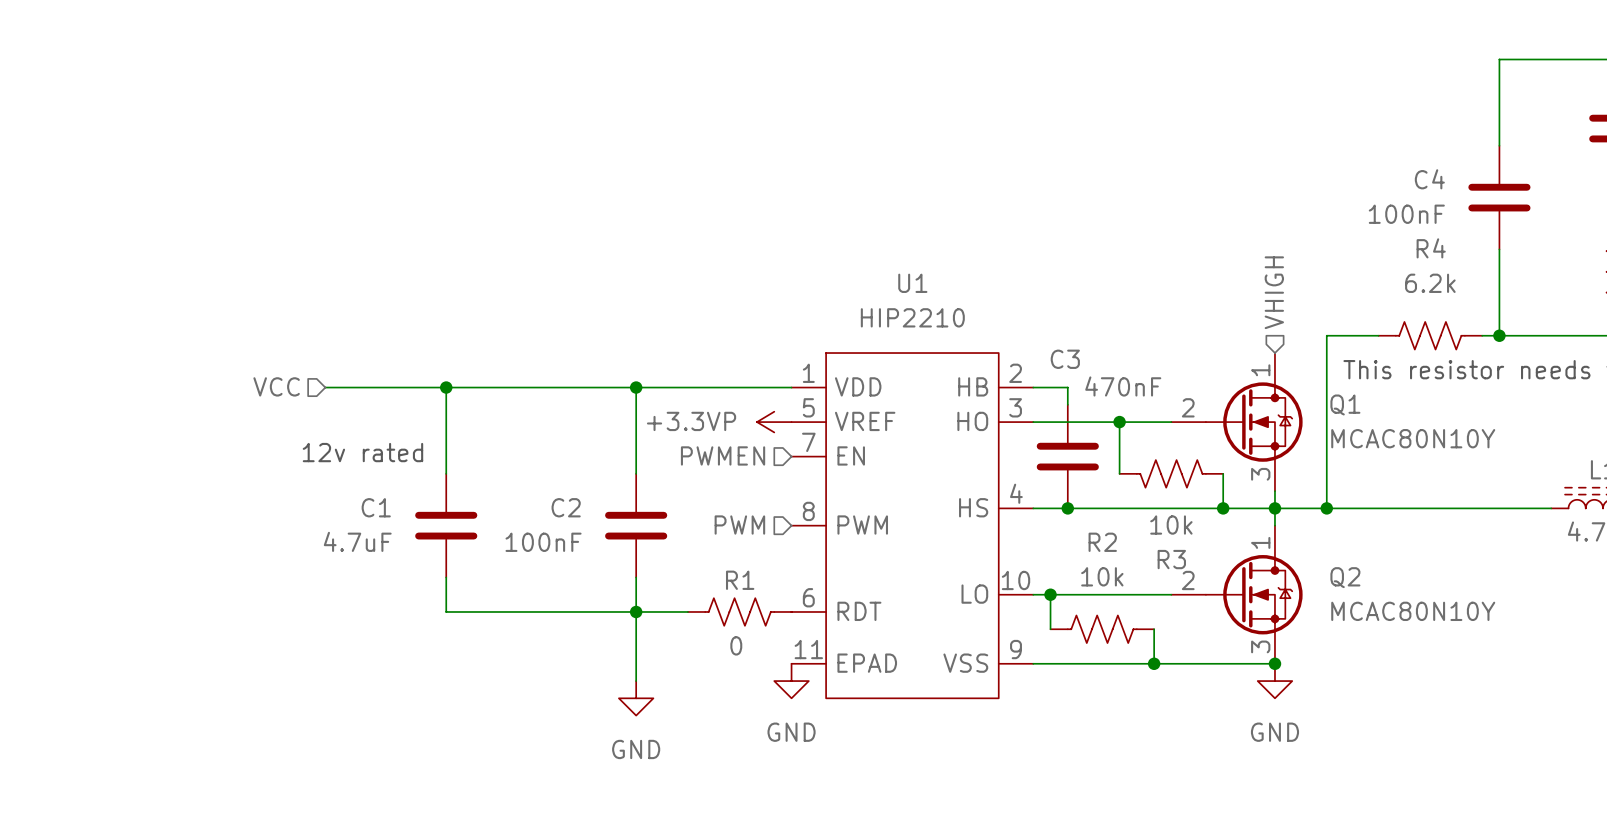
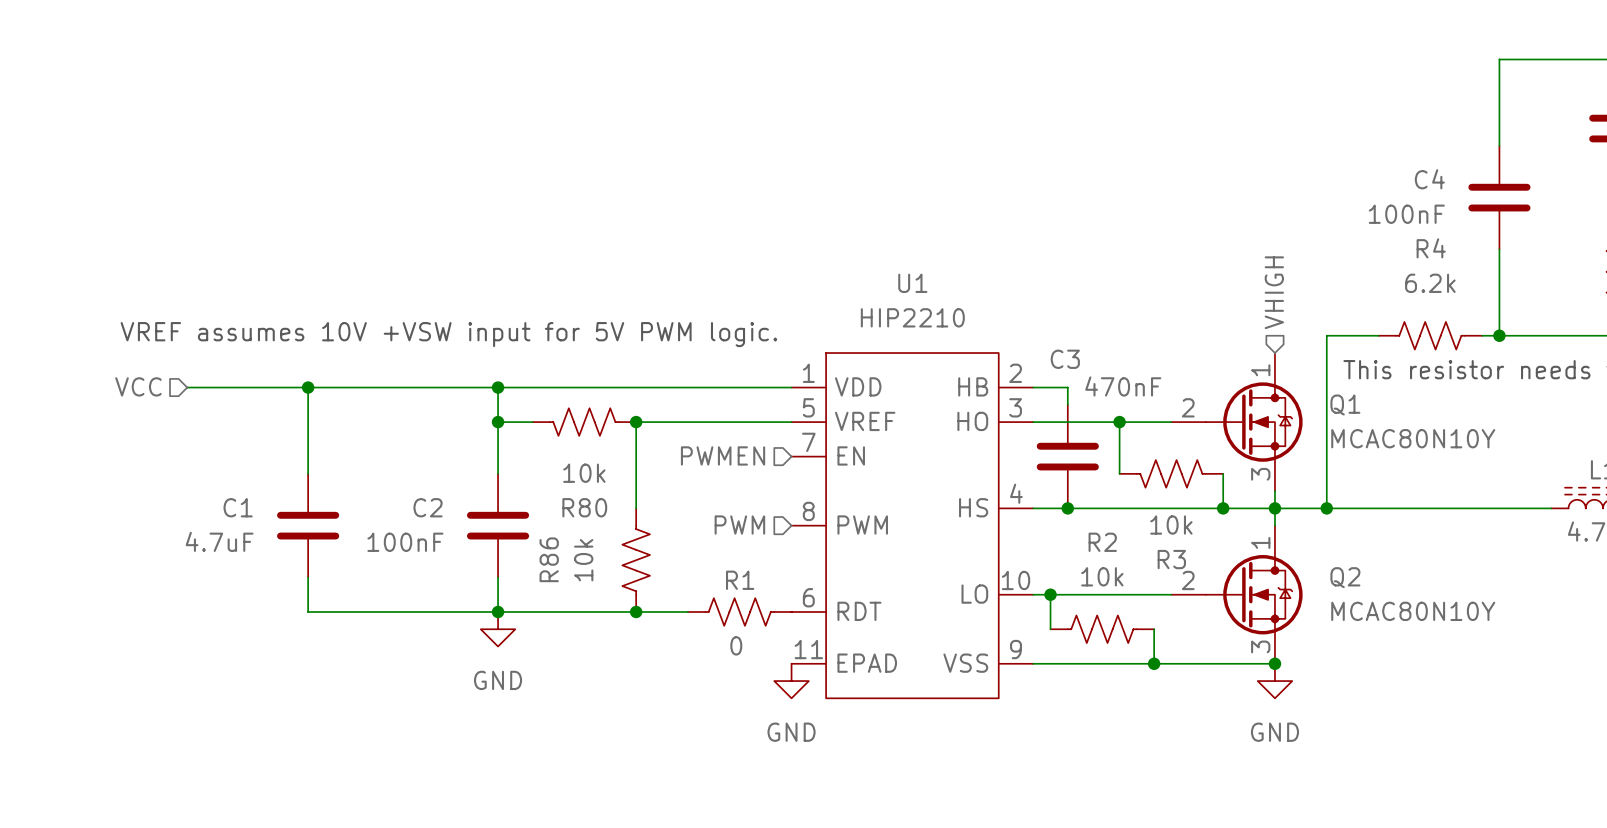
text: none -> VREF assumes 10V +VSW input for 5V PWM logic. (448, 334)
hierarchical label position: VCC (276, 386) -> VCC (138, 386)
wire: none -> (187, 387) (325, 387)
wire: none -> (308, 387) (308, 473)
junction: none -> (308, 387)
wire: (446, 387) (446, 473) -> (498, 387) (498, 473)
junction: (446, 387) -> none
junction: none -> (498, 387)
wire: (636, 387) (636, 422) -> (791, 422) (636, 422)
junction position: (636, 387) -> (636, 422)
wire: none -> (498, 422) (532, 422)
junction: none -> (498, 422)
R80: none -> 10k (584, 422)
power symbol: +3.3VP (774, 422) -> none
text: 12v rated (362, 452) -> none
C1 position: (446, 525) -> (308, 525)
C2 position: (636, 525) -> (498, 525)
R86: none -> 10k (636, 560)
wire: (446, 577) (446, 611) -> (308, 577) (308, 611) (446, 611)
wire: none -> (498, 577) (498, 611)
wire: (636, 577) (636, 681) -> none
junction: none -> (498, 611)
power symbol position: GND (636, 698) -> GND (498, 629)

